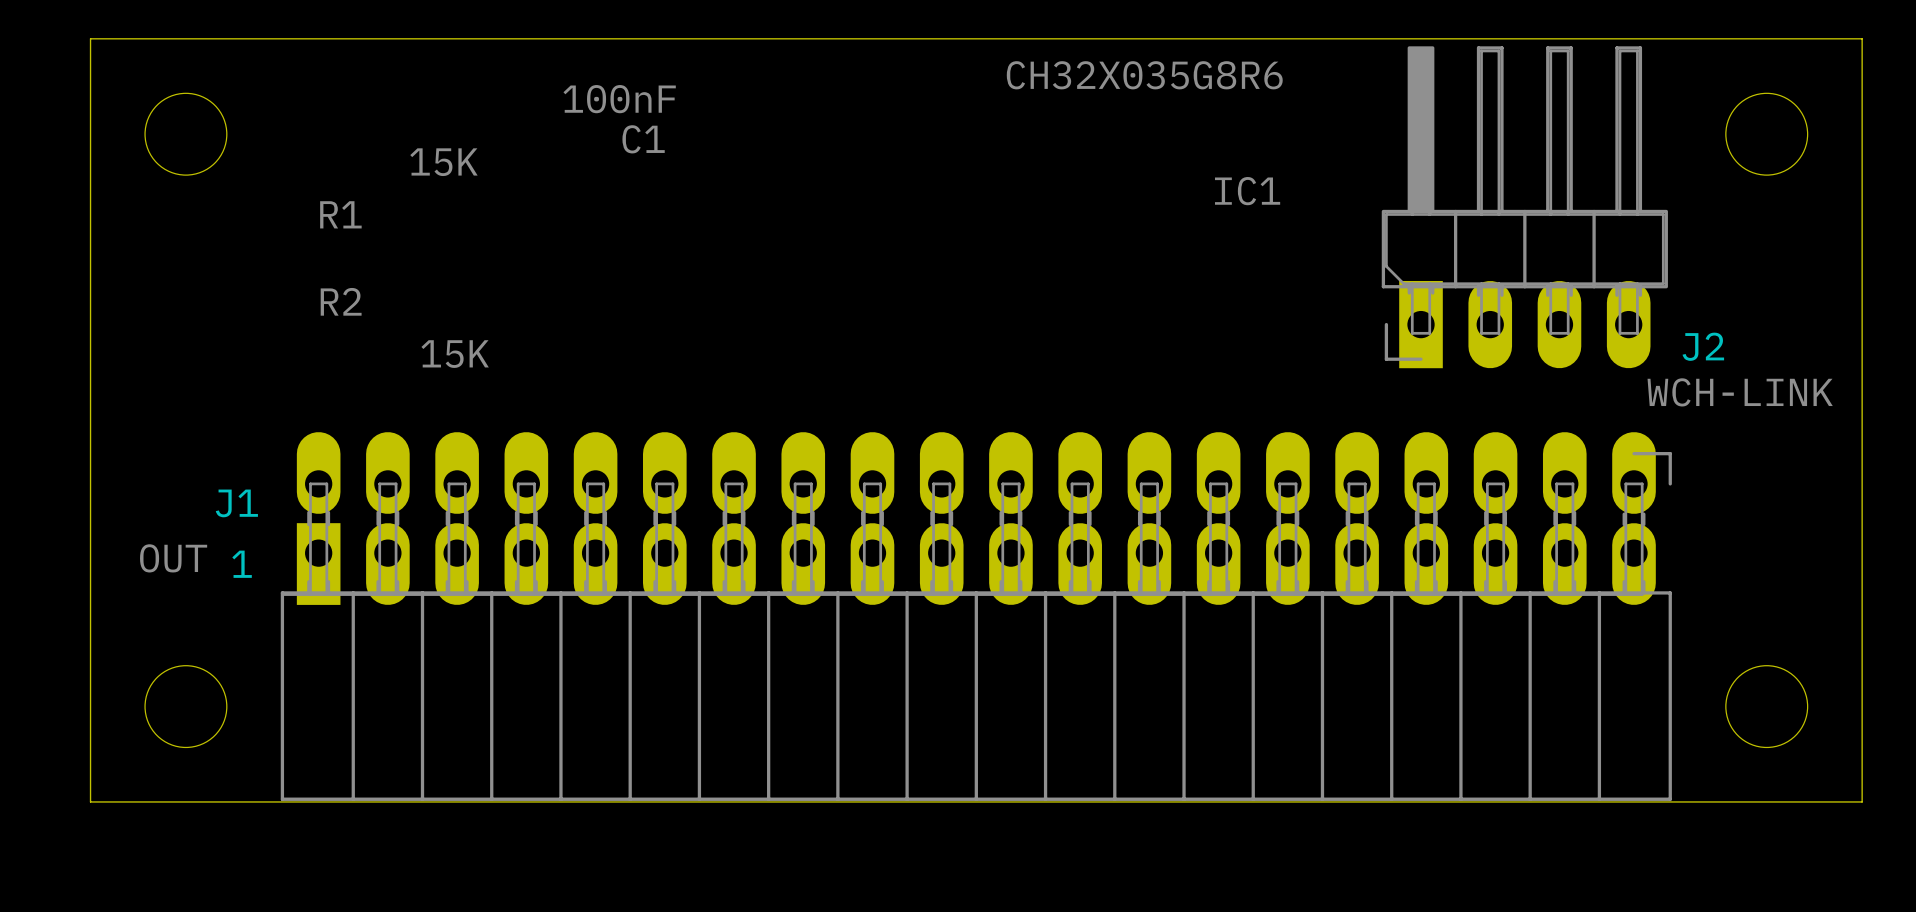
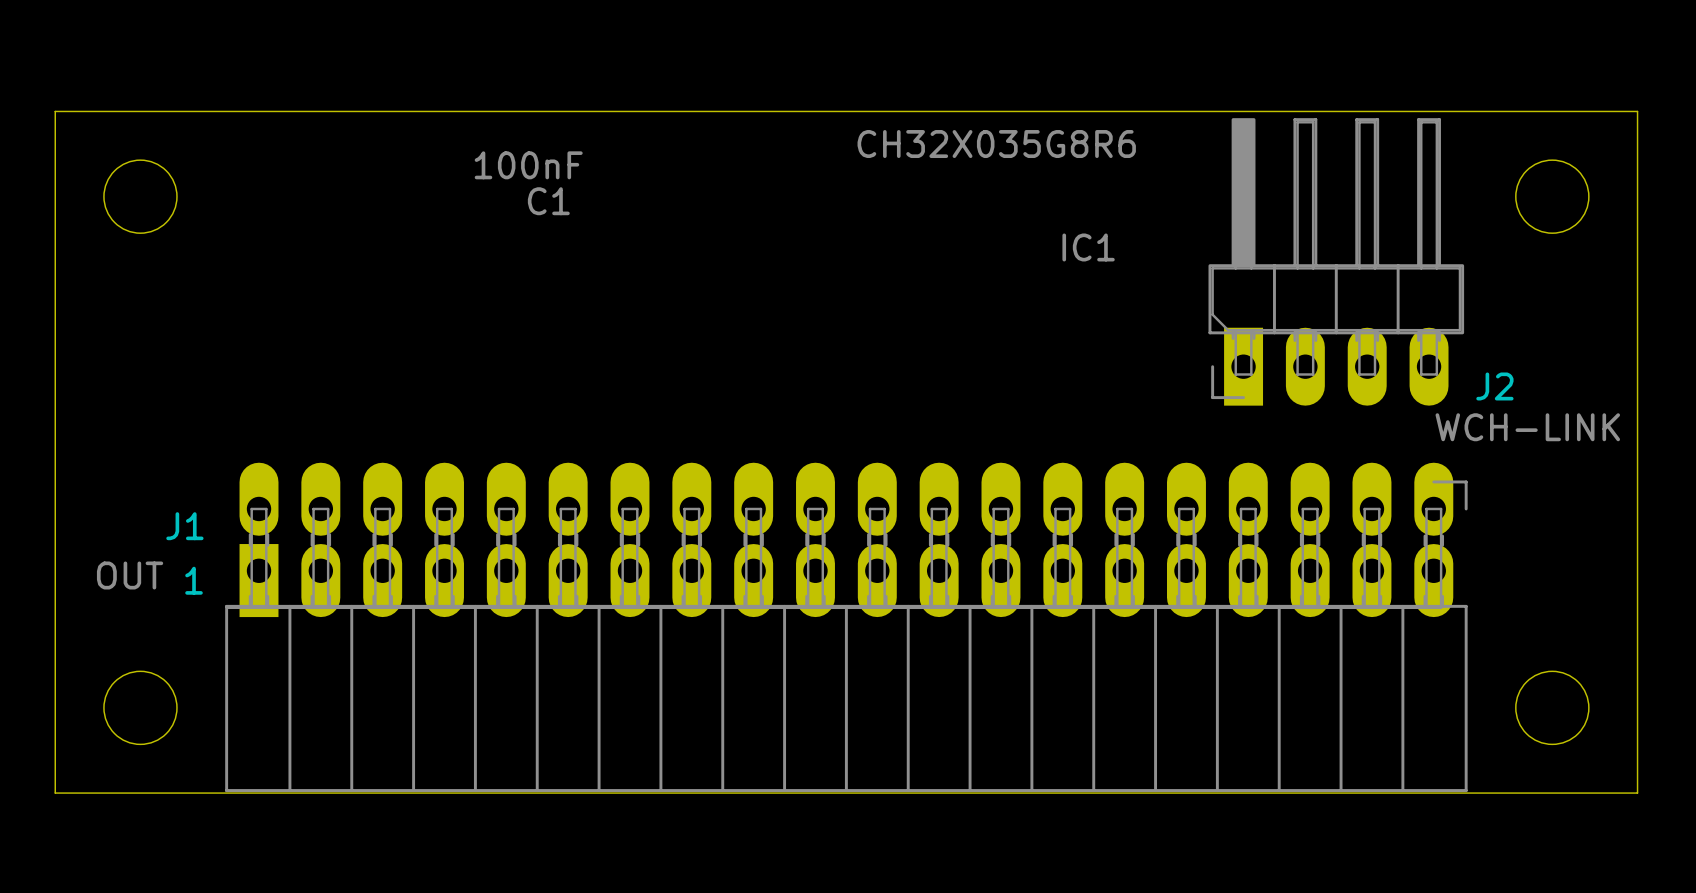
R1: 15K (398, 188) -> none
R2: 15K (404, 327) -> none

